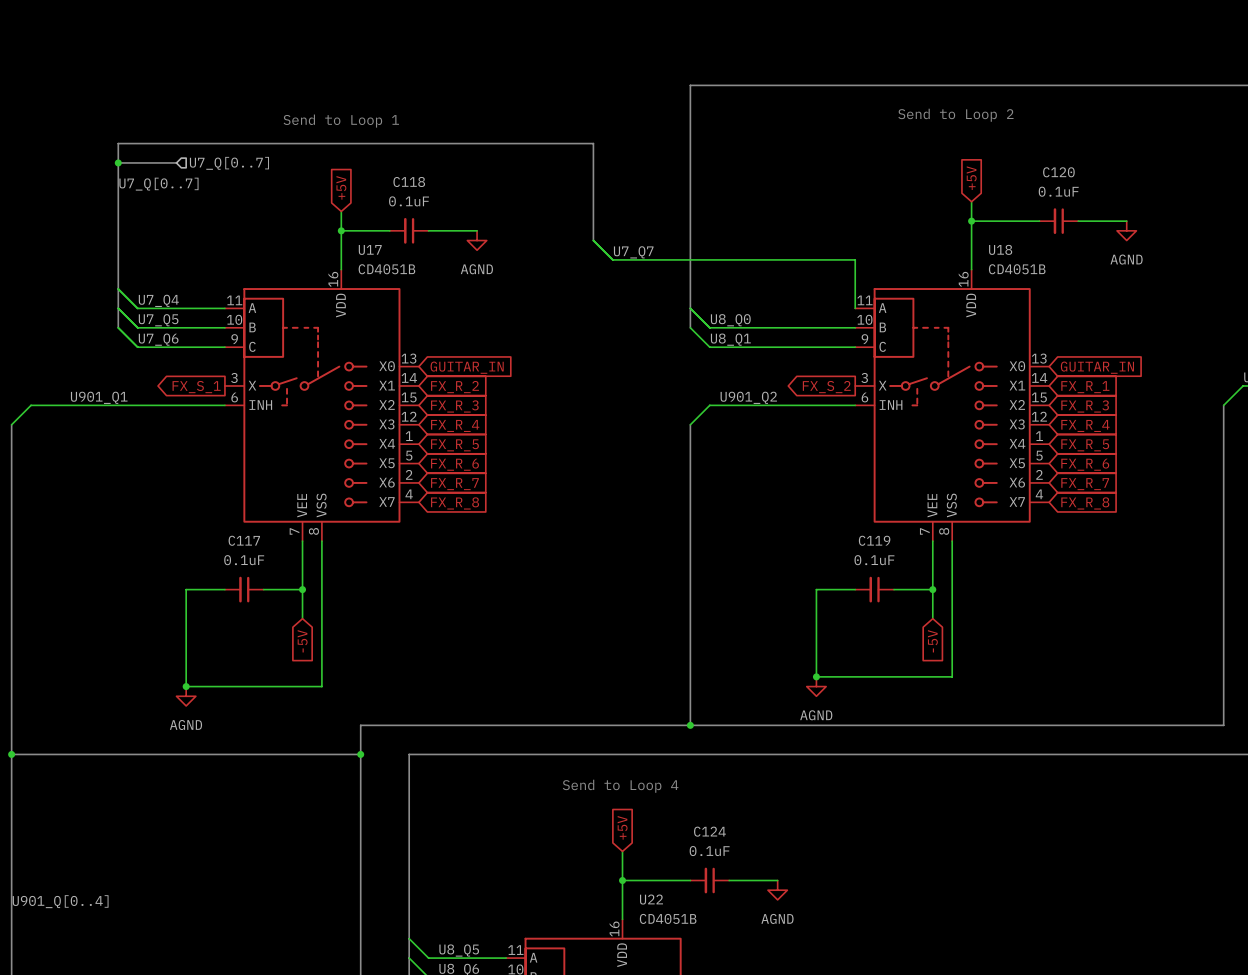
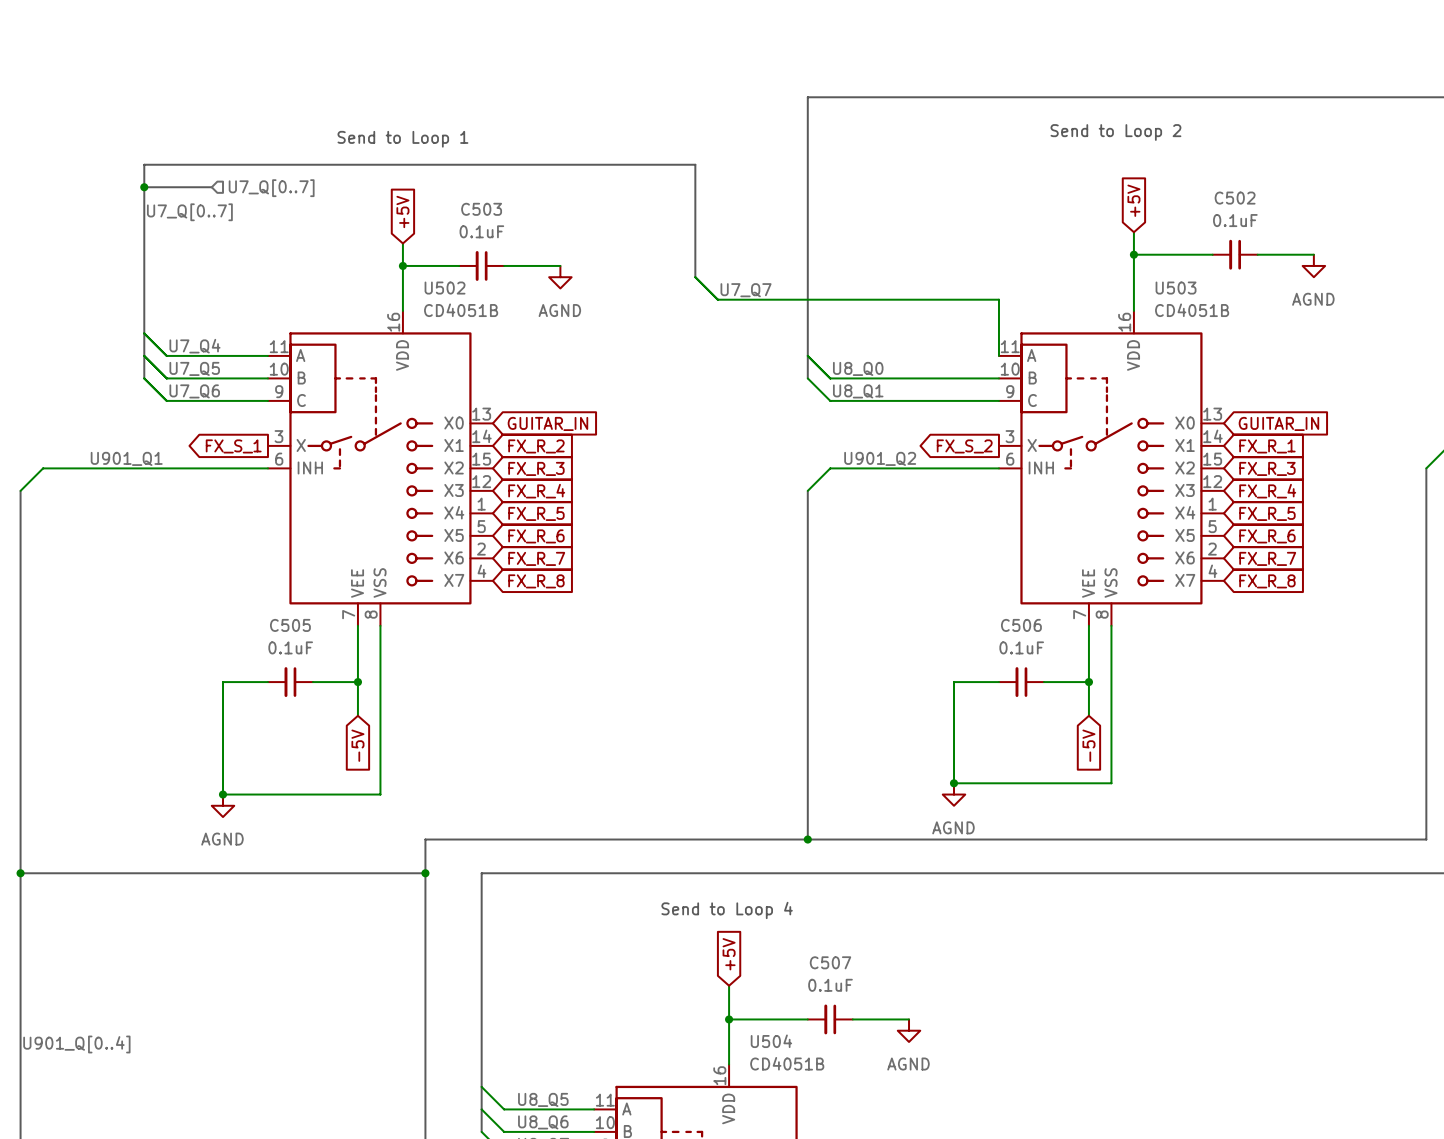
C120 name: C120 (1058, 172) -> C502 (1235, 198)
C118 name: C118 (409, 182) -> C503 (481, 209)
U17 name: U17 (370, 249) -> U502 (445, 288)
U18 name: U18 (1000, 249) -> U503 (1176, 288)
C117 name: C117 (244, 540) -> C505 (290, 625)
C119 name: C119 (874, 540) -> C506 (1021, 625)
C124 name: C124 (709, 831) -> C507 (830, 962)
U22 name: U22 (651, 899) -> U504 (771, 1041)

